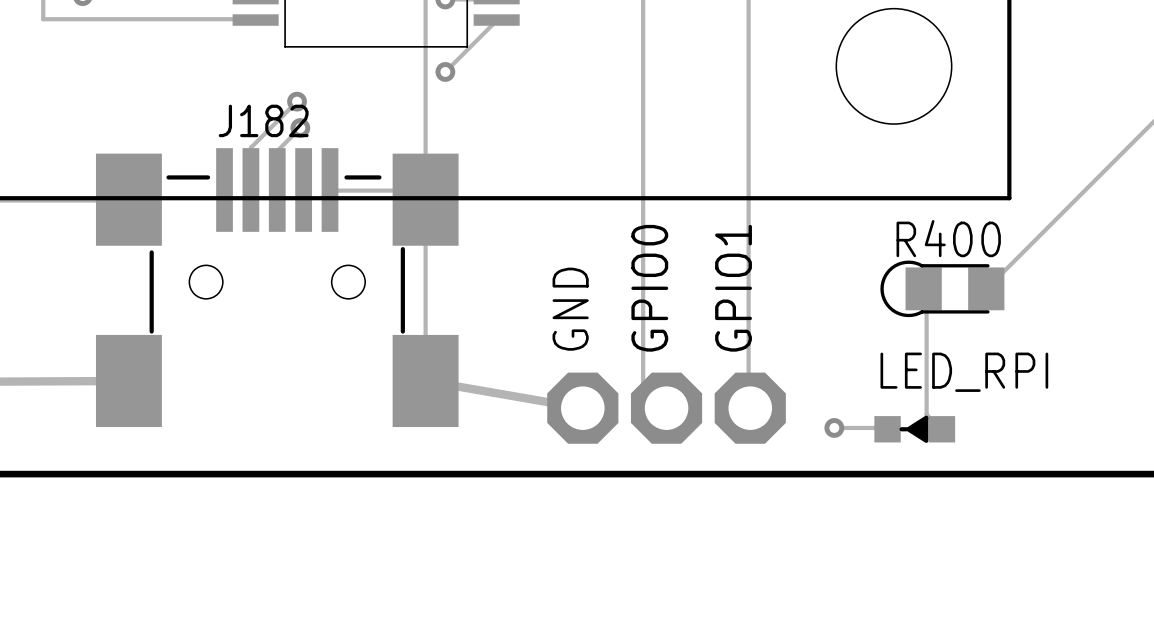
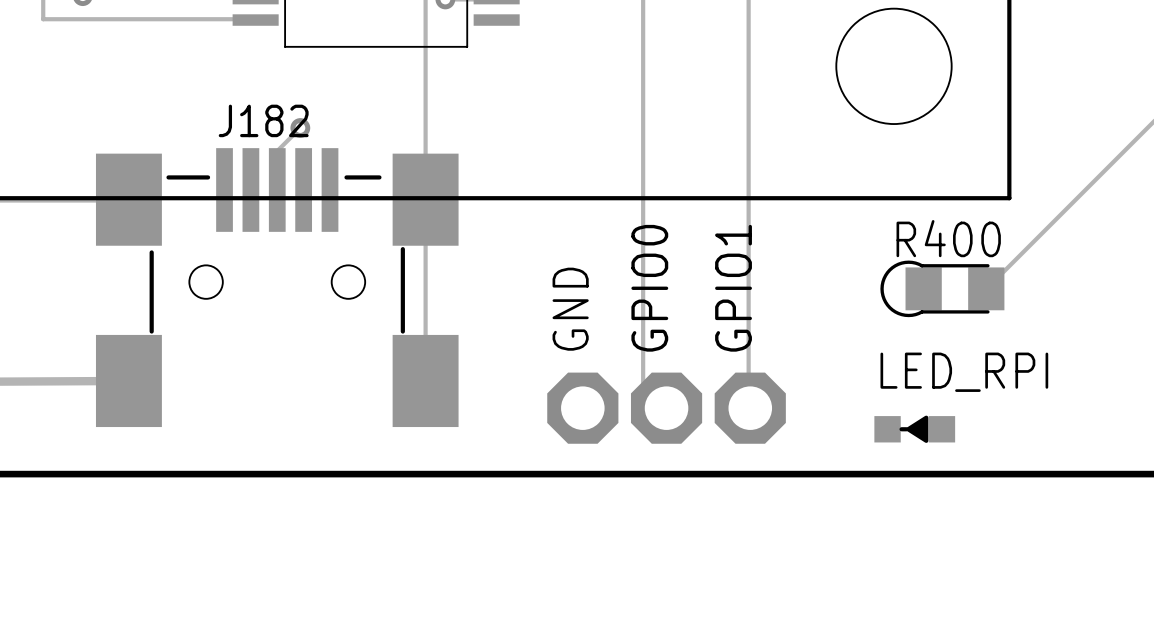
track: (496, 20) (445, 71) -> none
via: (445, 71) -> none
track: (297, 101) (250, 147) (250, 189) -> none
via: (297, 101) -> none
track: (330, 190) (425, 190) -> none
track: (923, 288) (926, 289) (926, 414) (941, 429) -> none
track: (425, 380) (582, 408) (580, 408) -> none
track: (834, 427) (887, 429) -> none
via: (834, 427) -> none

